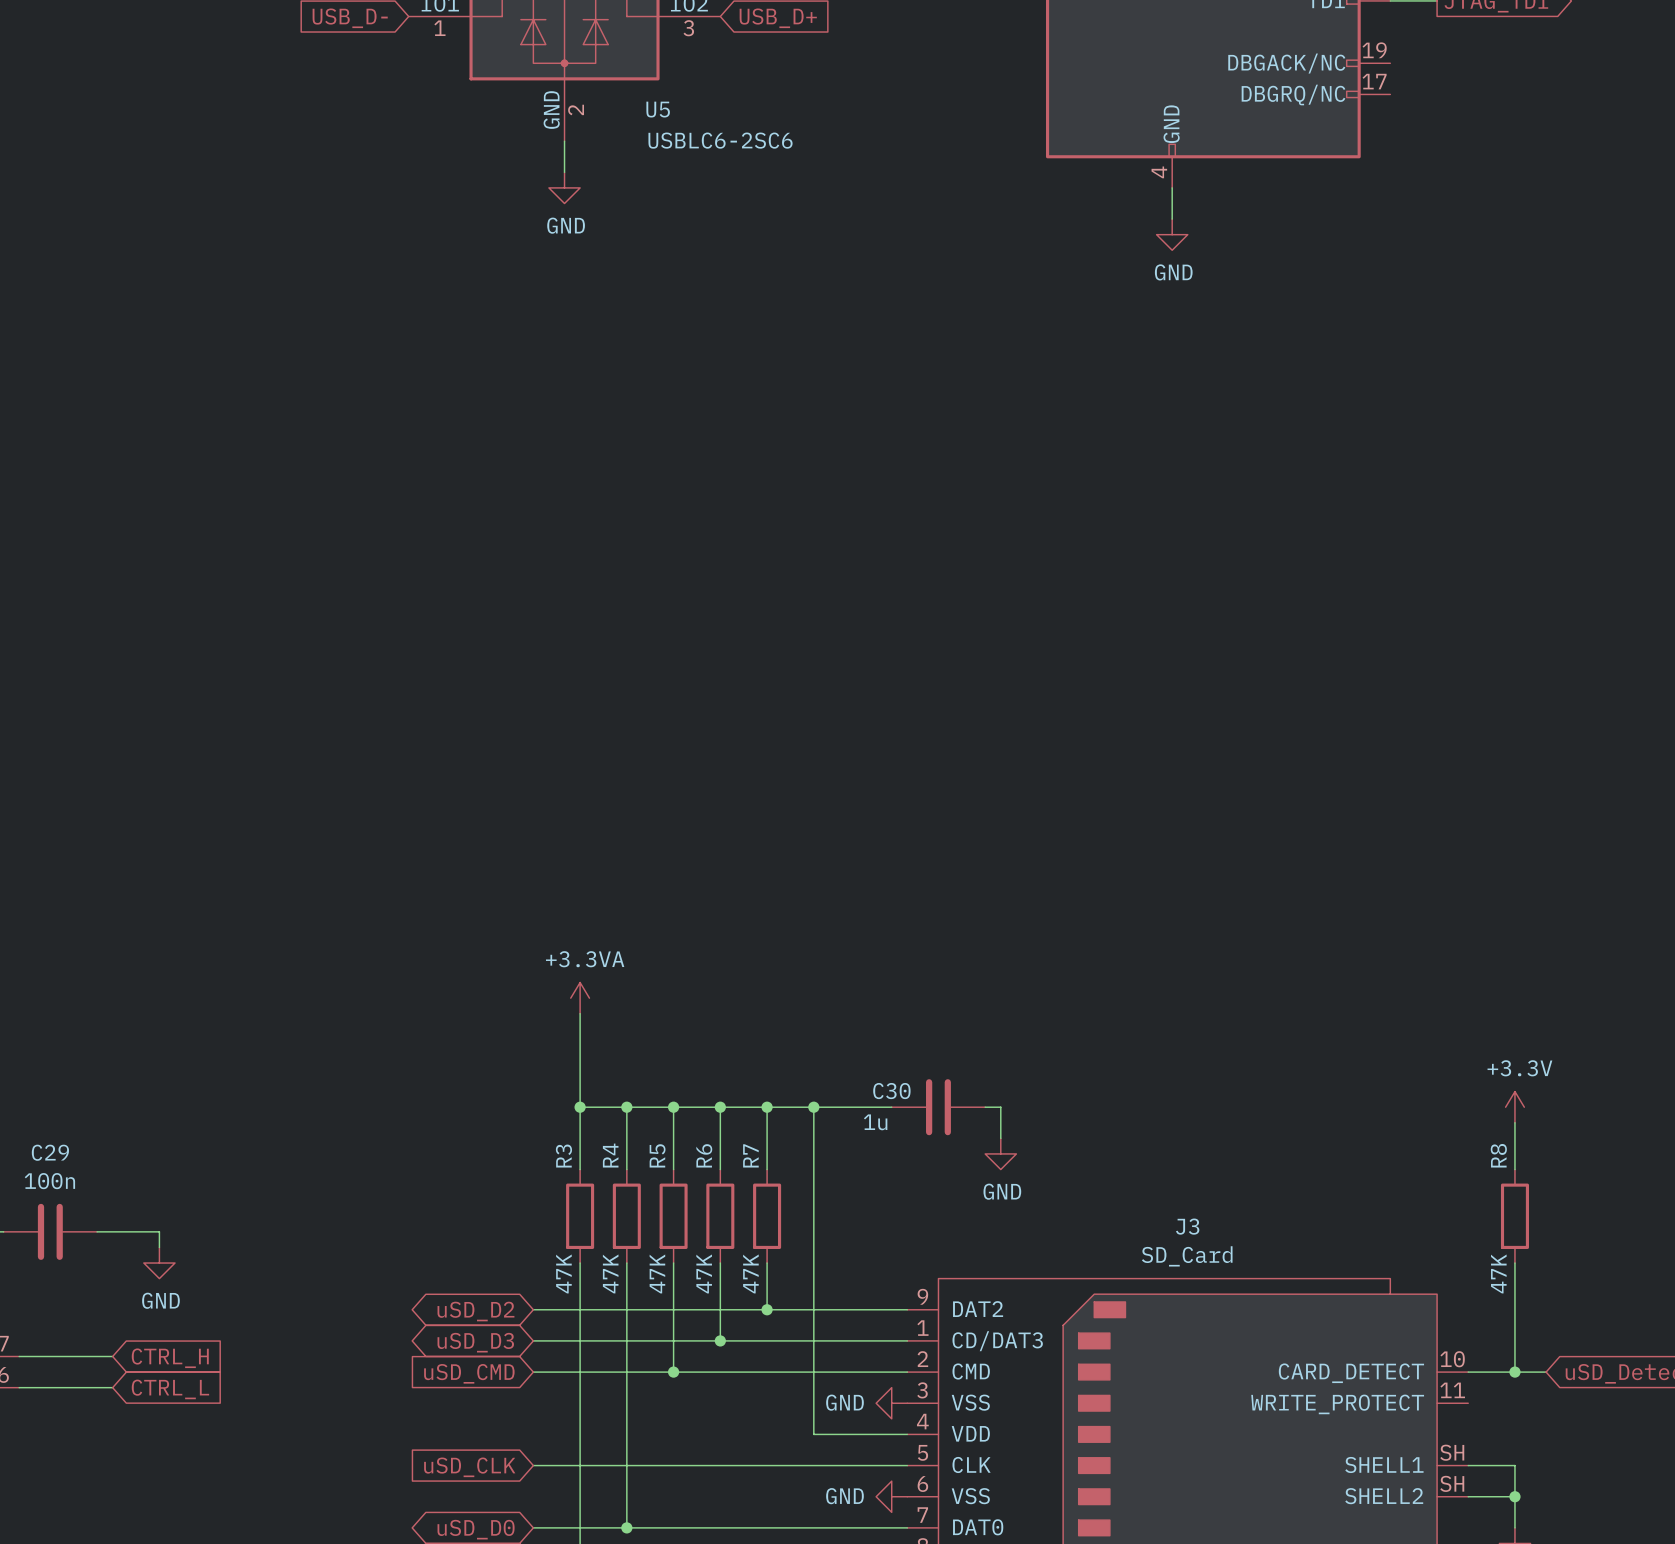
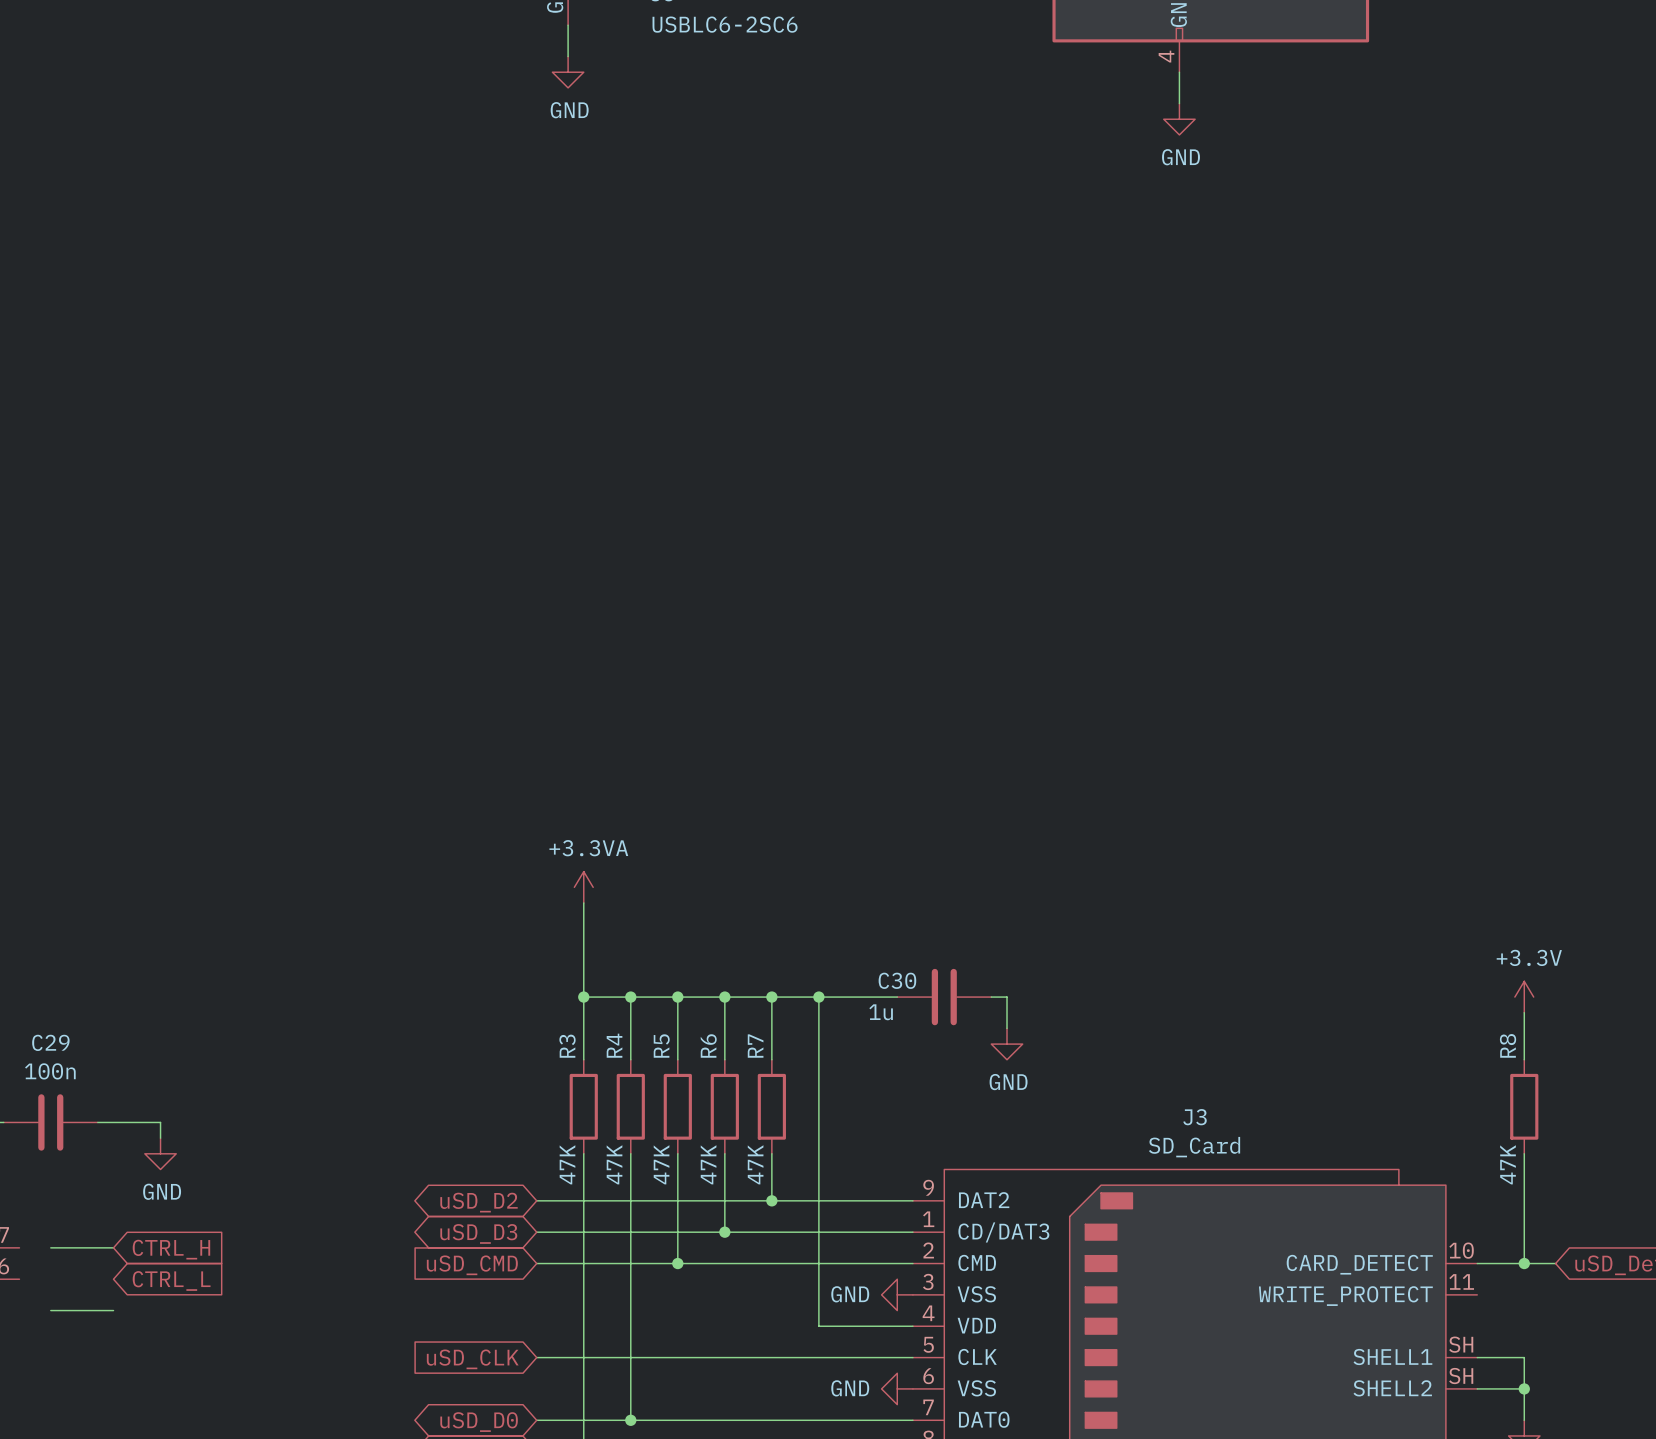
wire: (19, 1356) (50, 1356) -> none
wire: (19, 1387) (112, 1387) -> none
wire: none -> (50, 1310) (113, 1310)

